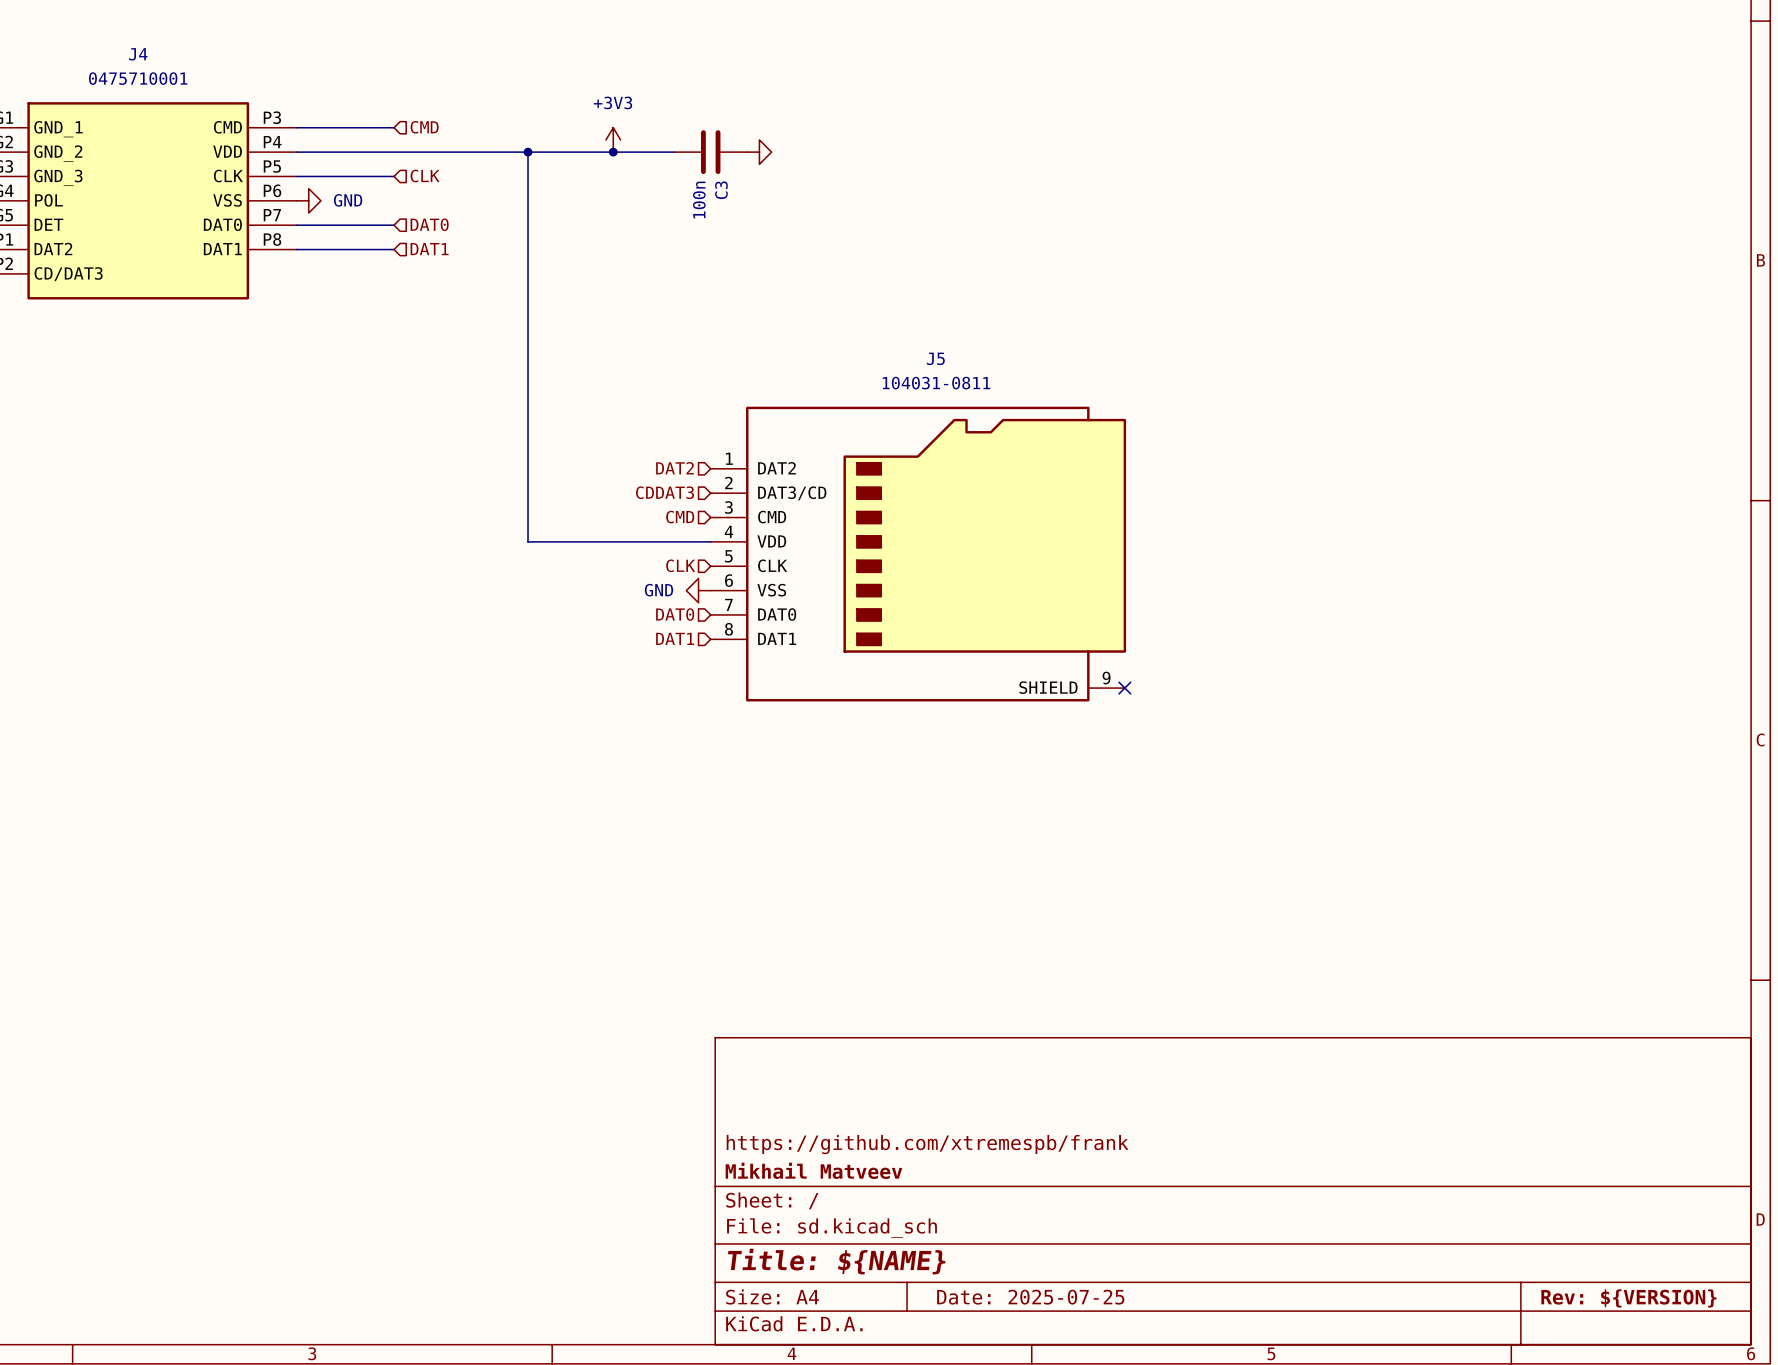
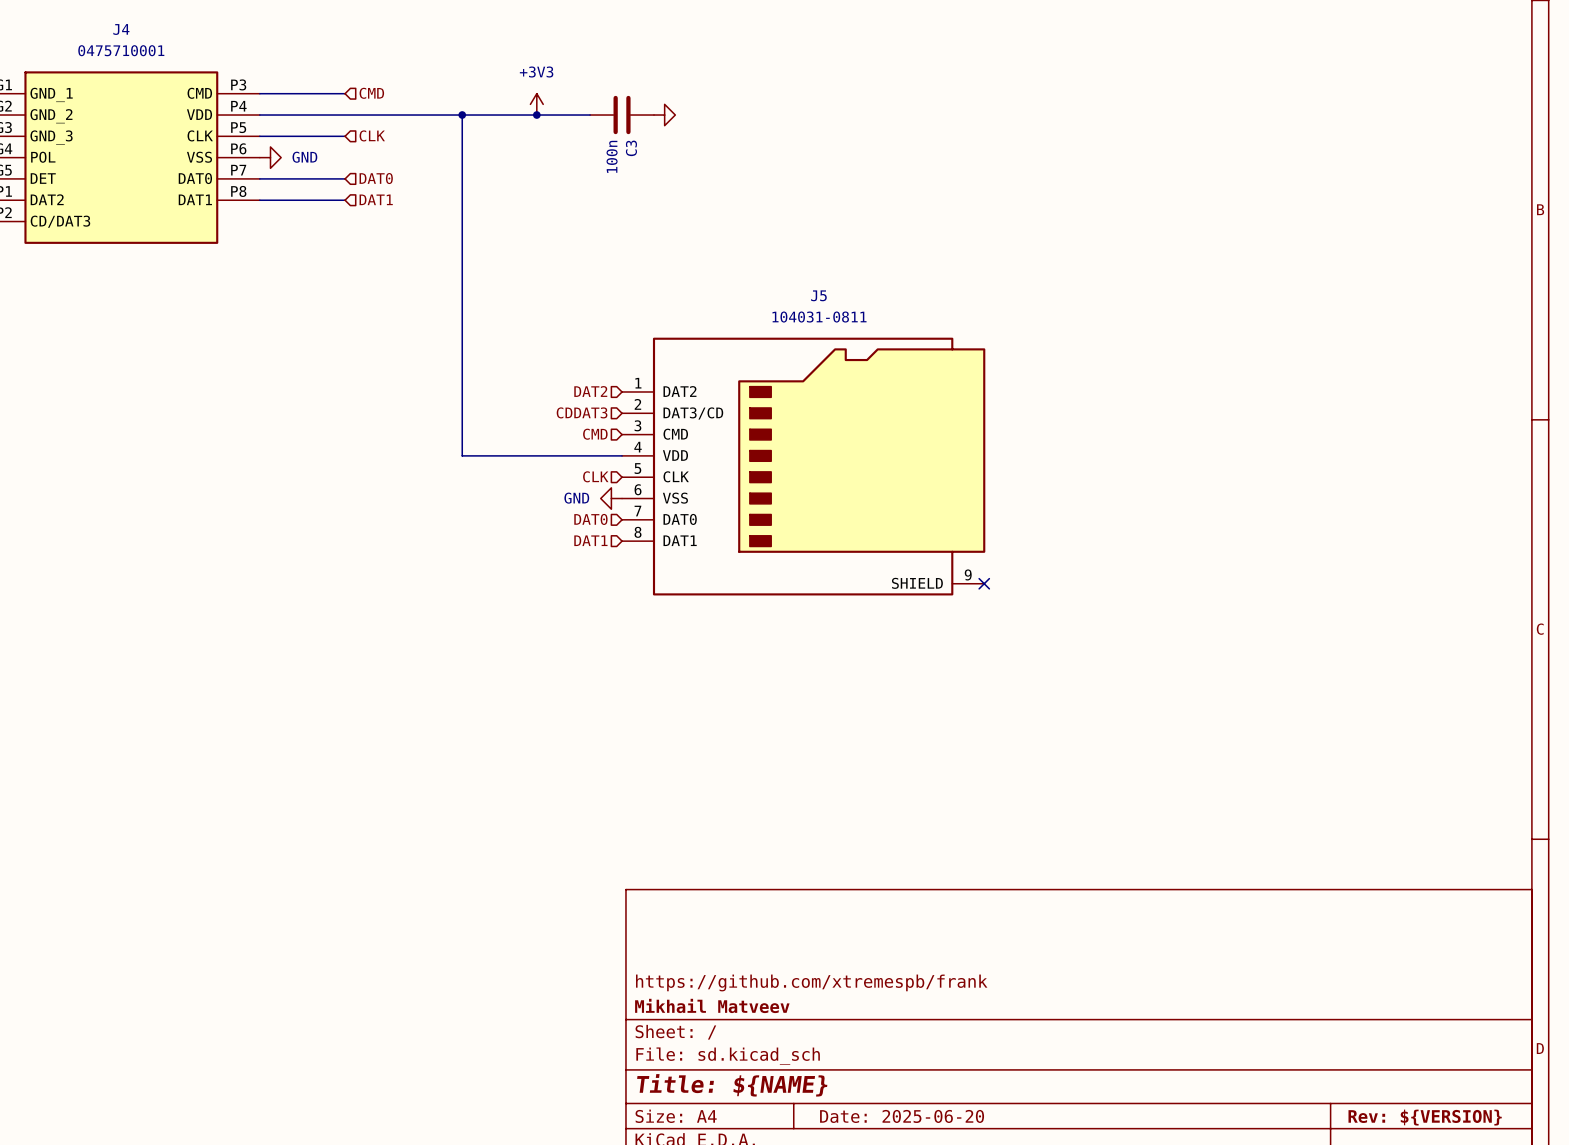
title block: Date: 2025-07-25 (1030, 1297) -> Date: 2025-06-20 (902, 1116)

